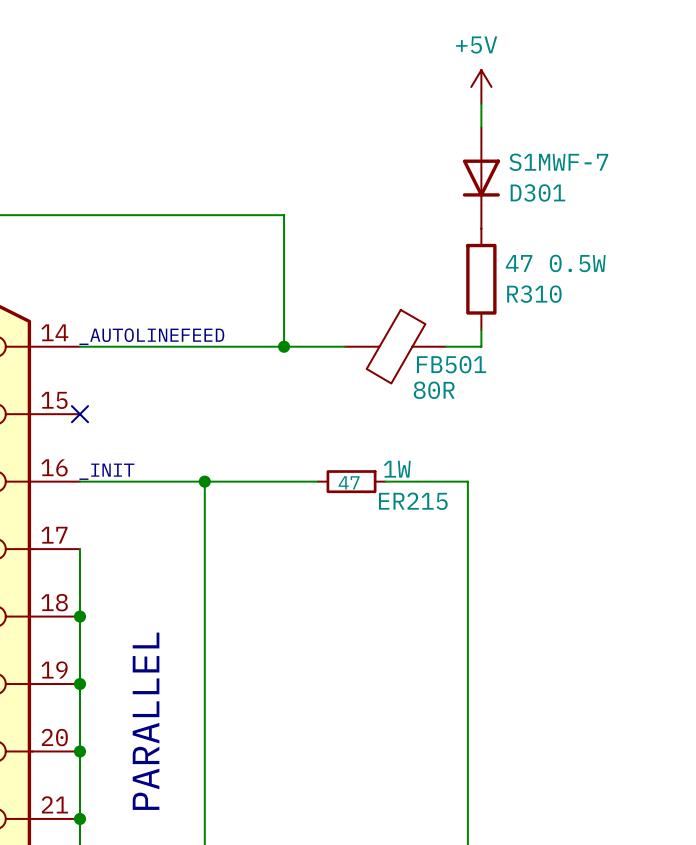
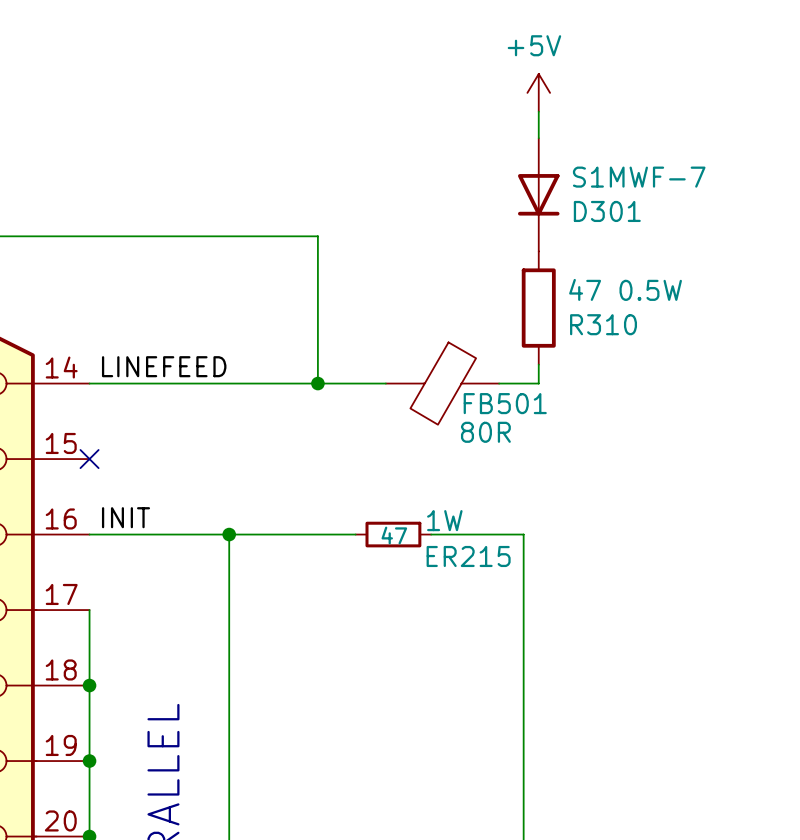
label: none -> LINEFEED (164, 366)
text: _AUTOLINEFEED (151, 336) -> none
label: none -> INIT (126, 517)
text: _INIT (106, 471) -> none

